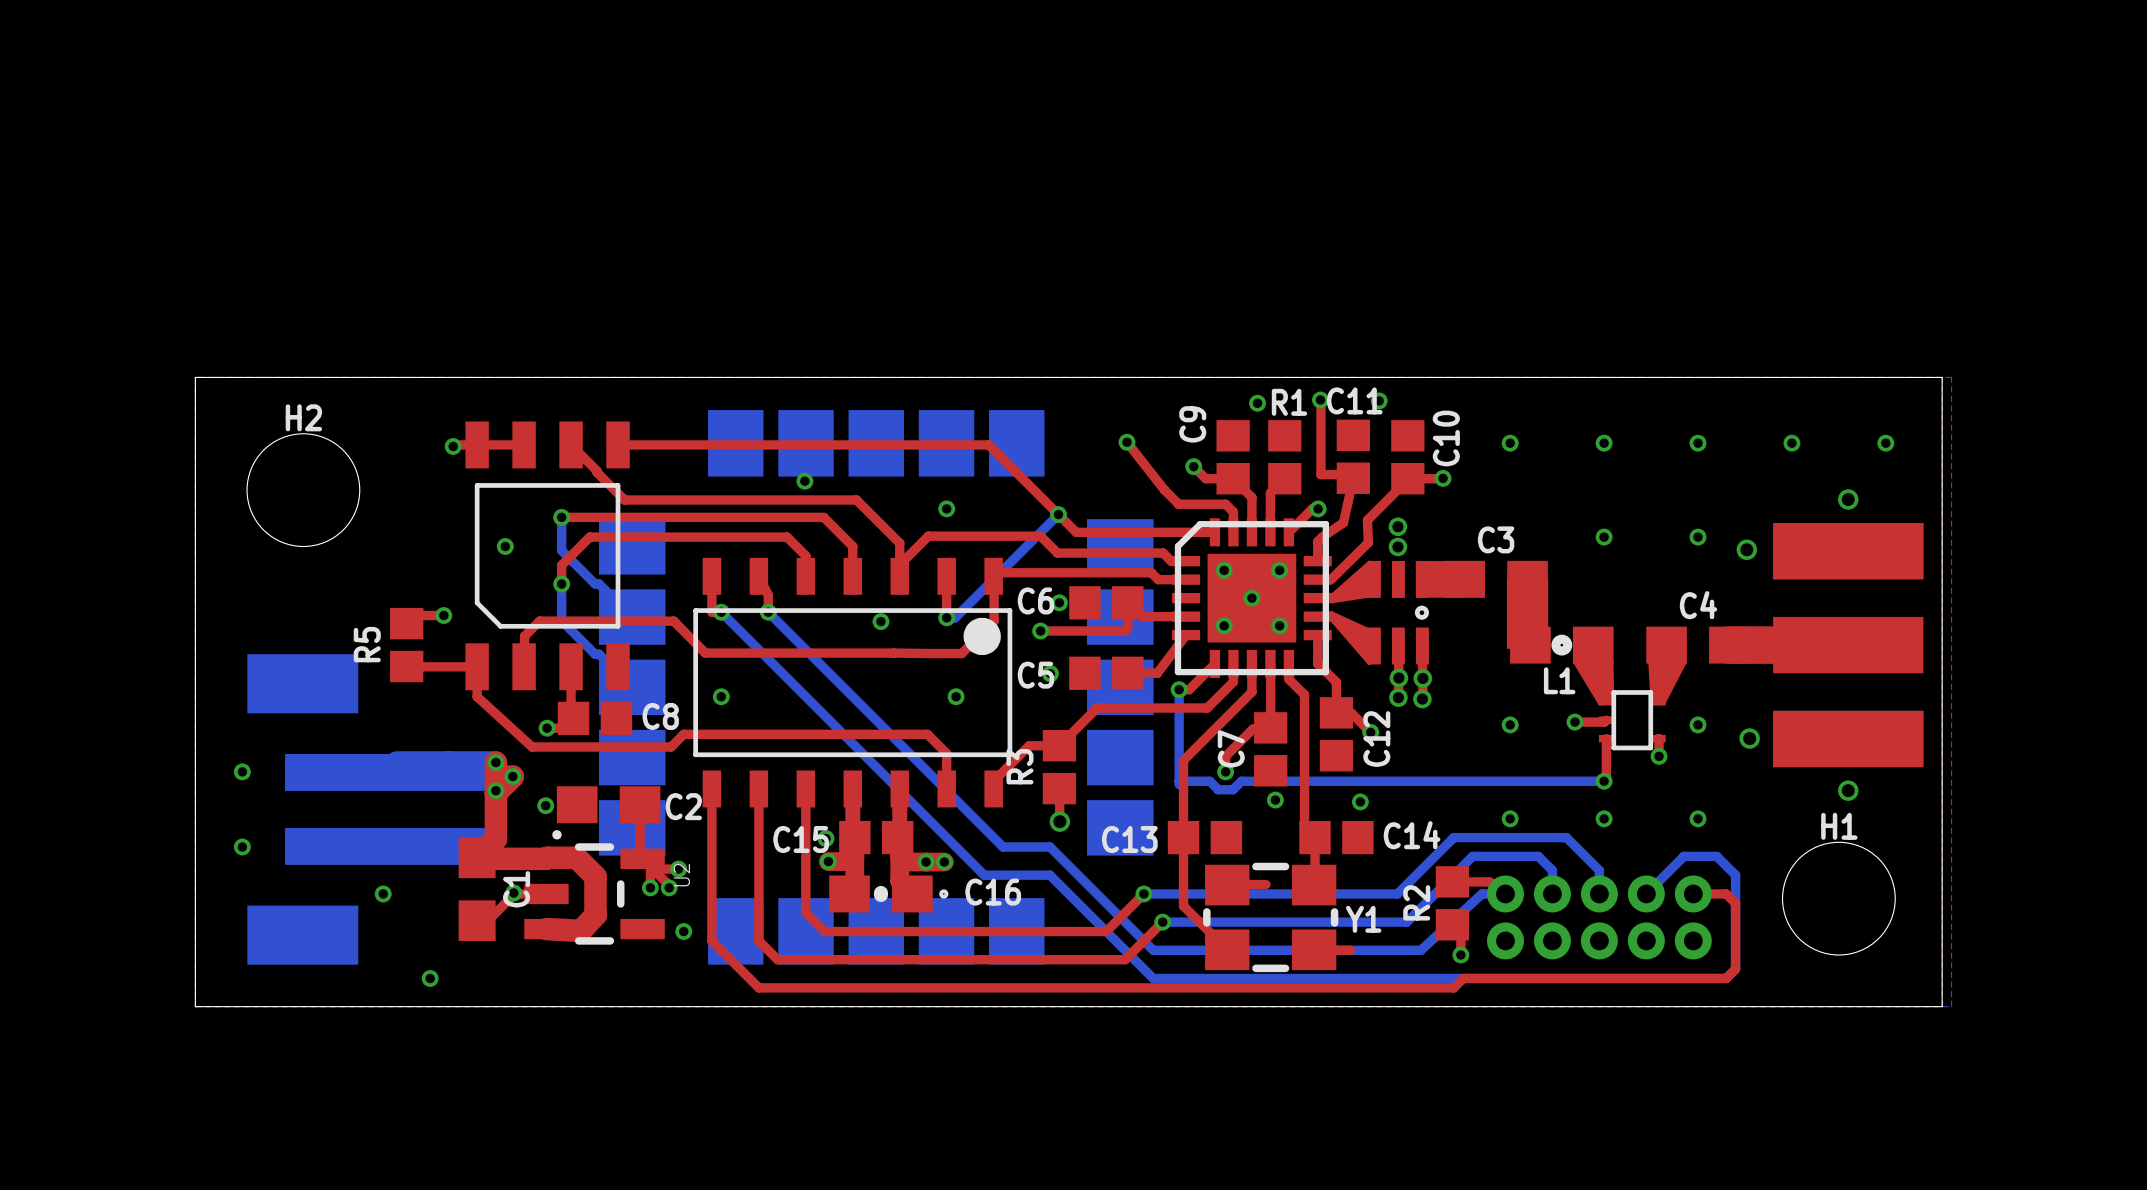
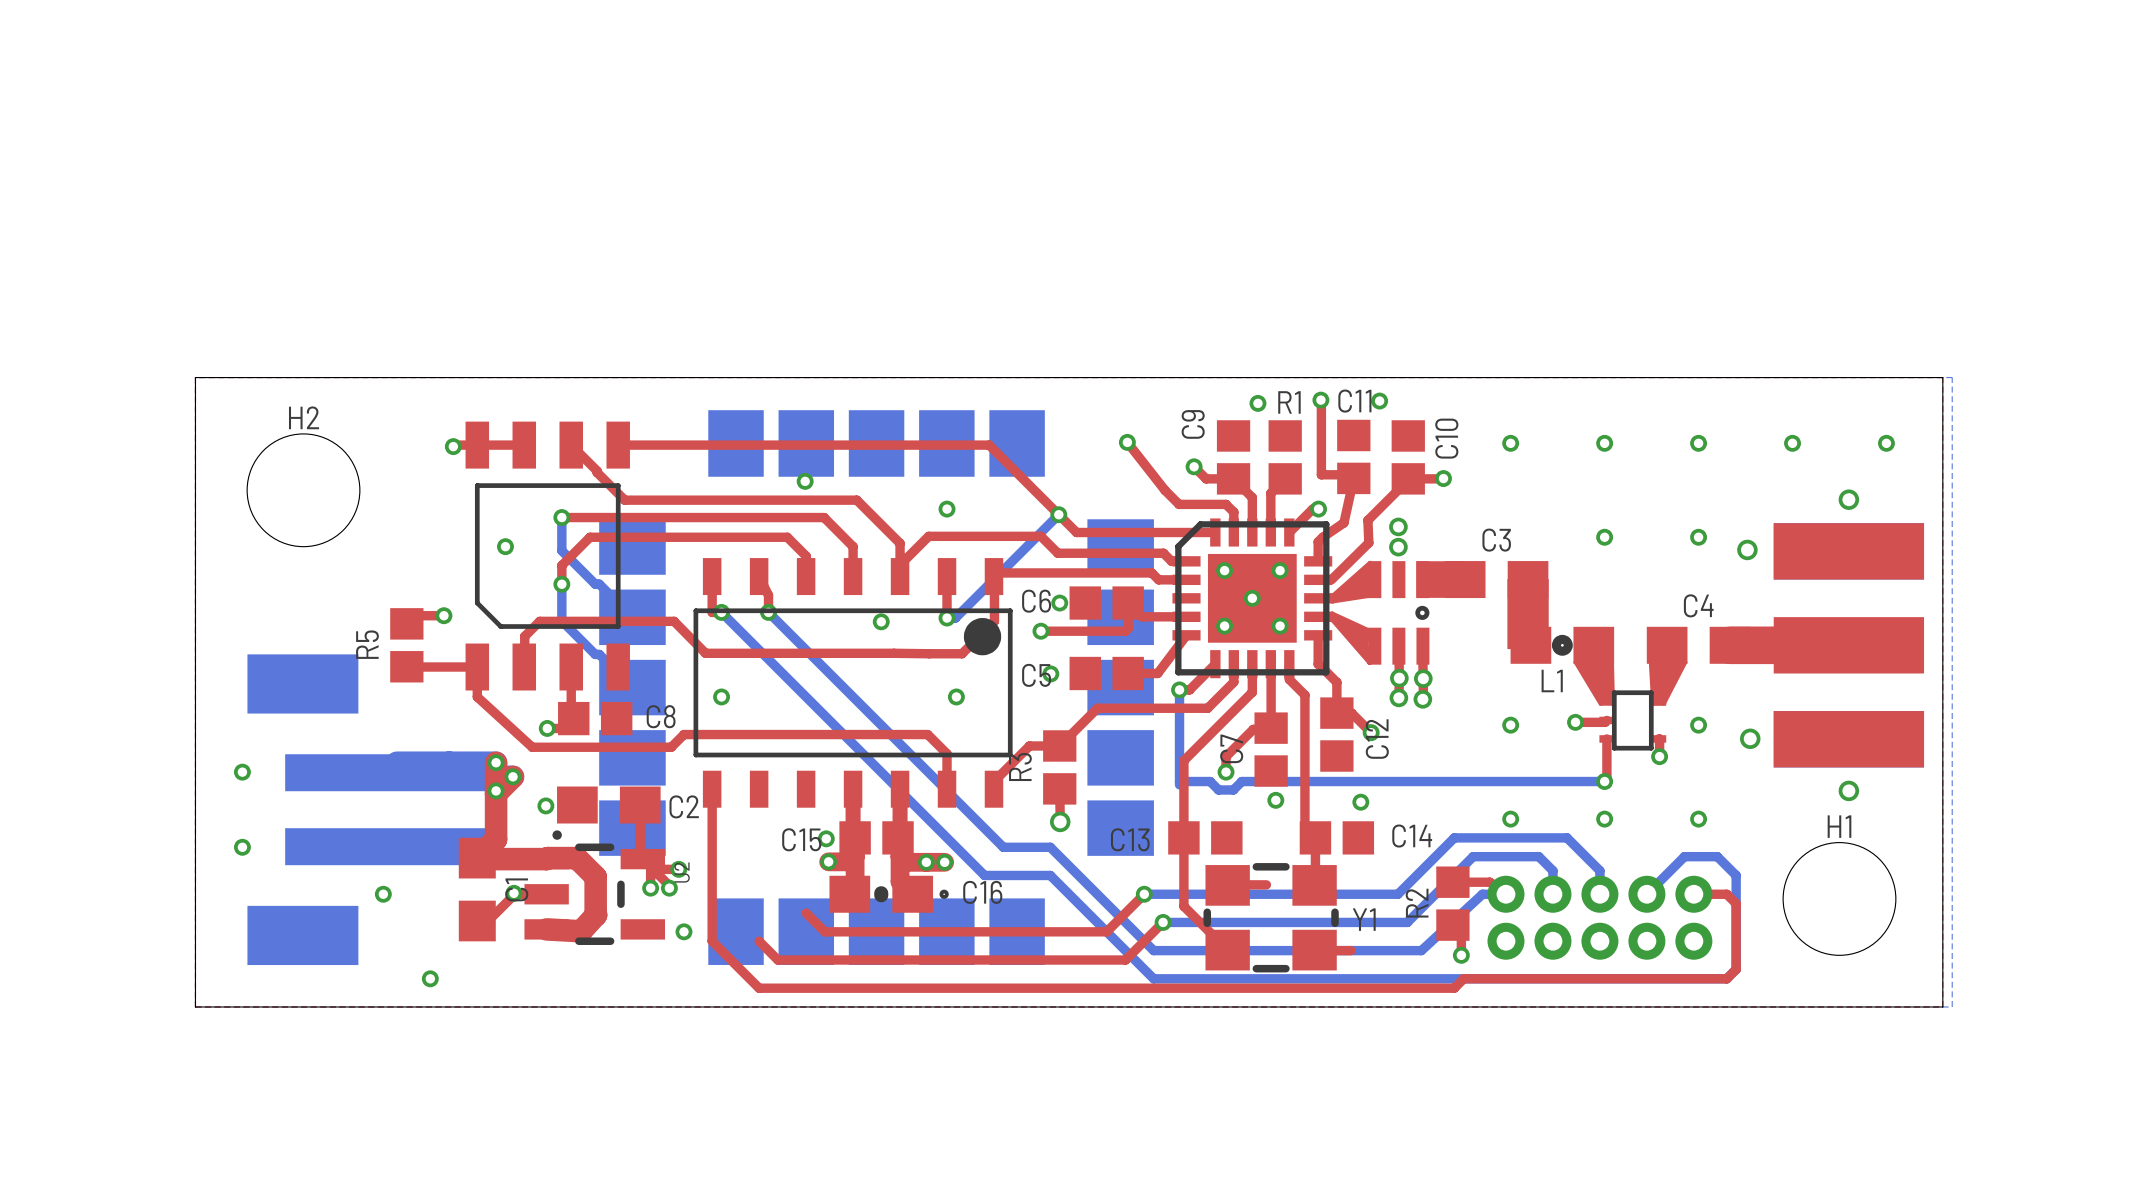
top track: (758, 788) (758, 940) -> none
top track: (805, 788) (805, 912) -> none

